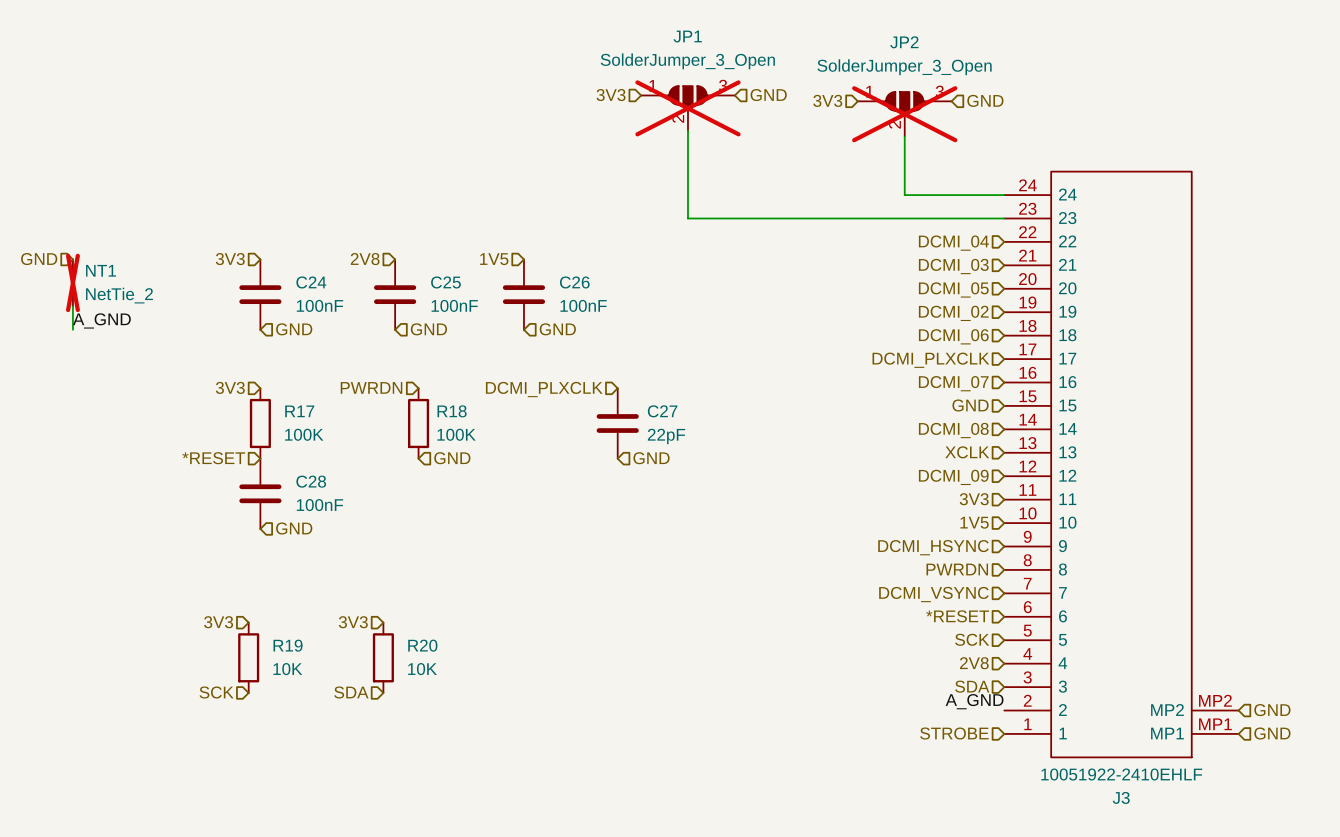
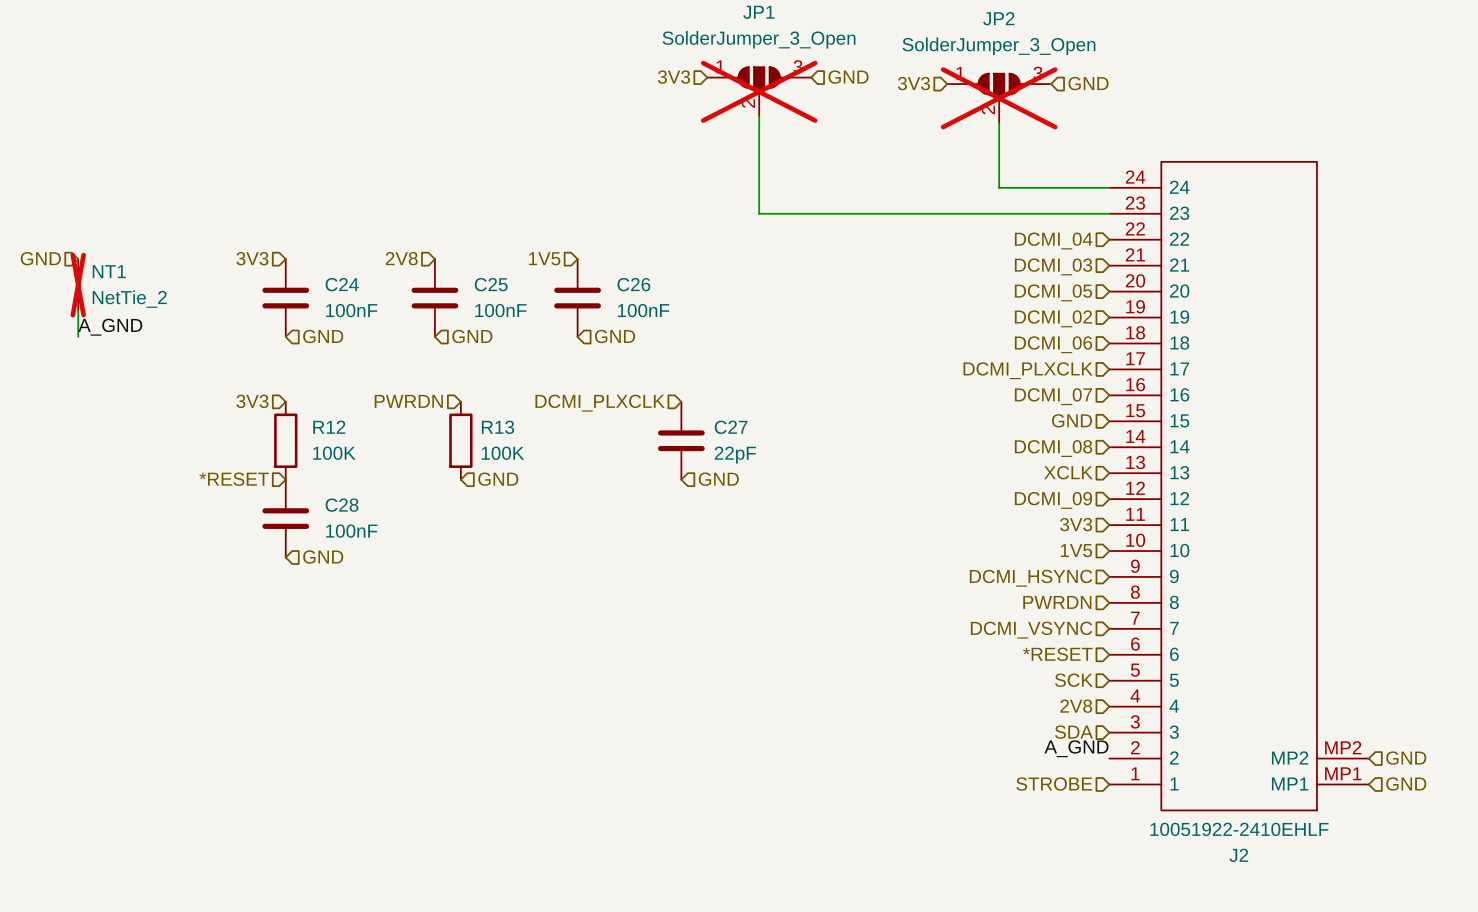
R17 name: R17 (299, 411) -> R12 (329, 427)
R18 name: R18 (452, 411) -> R13 (497, 427)
hierarchical label: 3V3 (218, 622) -> none
hierarchical label: 3V3 (353, 622) -> none
R19: 10K (248, 657) -> none
R20: 10K (383, 657) -> none
hierarchical label: SCK (216, 692) -> none
hierarchical label: SDA (351, 692) -> none
J3 name: J3 (1121, 797) -> J2 (1238, 855)

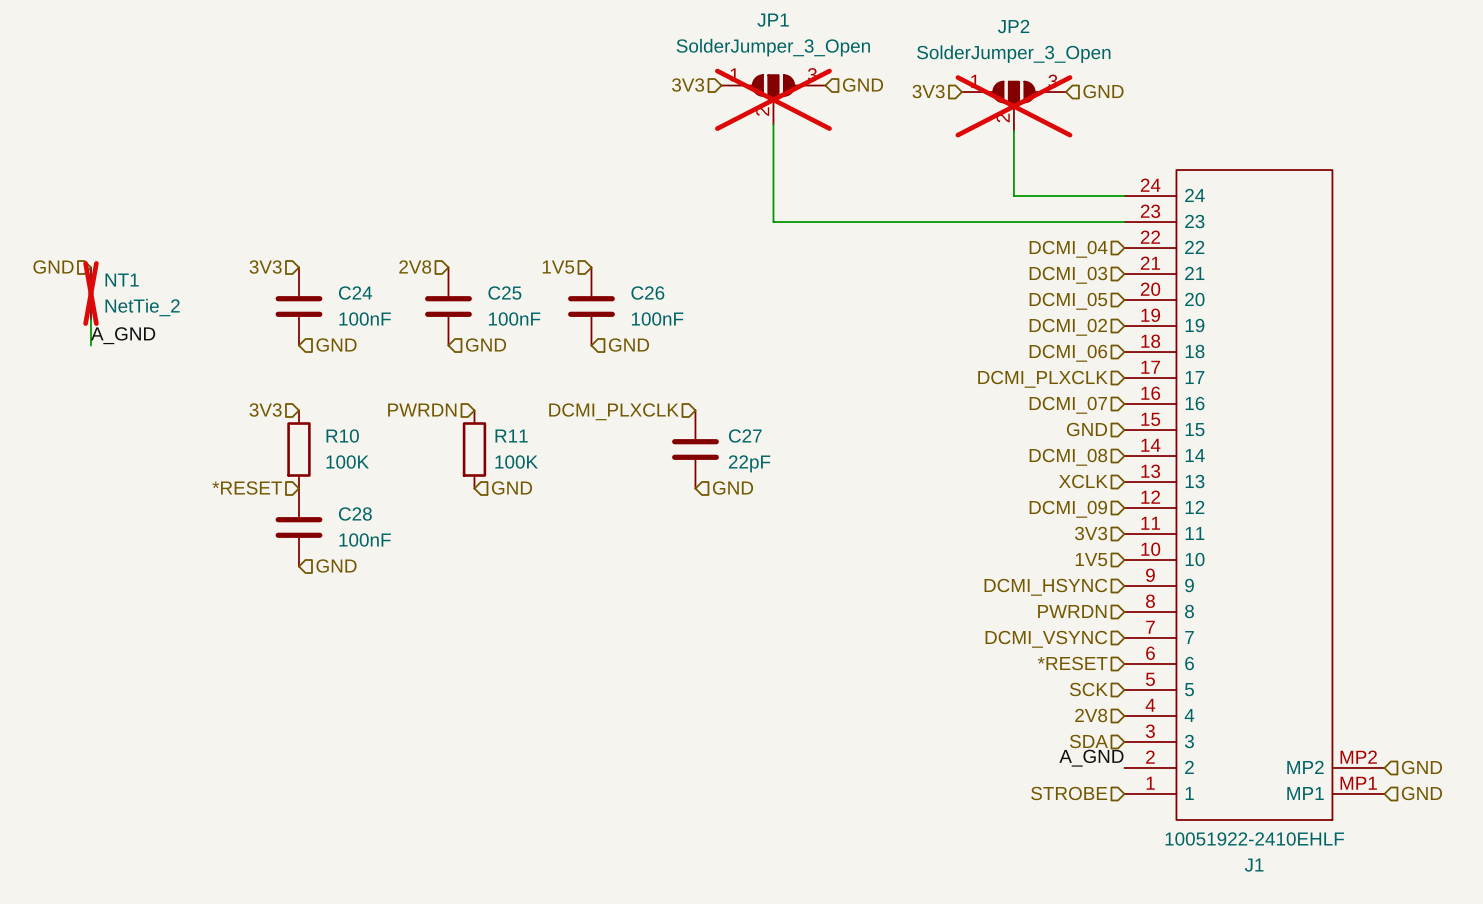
R12 name: R12 (329, 427) -> R10 (342, 436)
R13 name: R13 (497, 427) -> R11 (511, 436)
J2 name: J2 (1238, 855) -> J1 (1254, 865)

